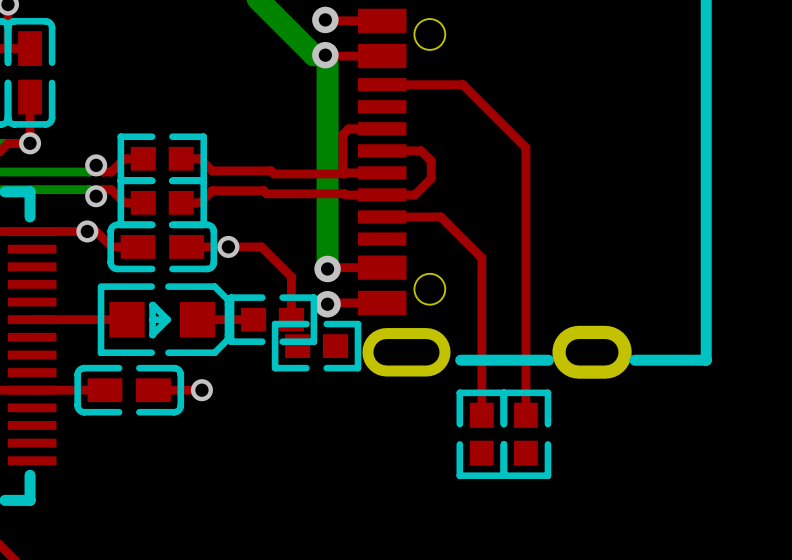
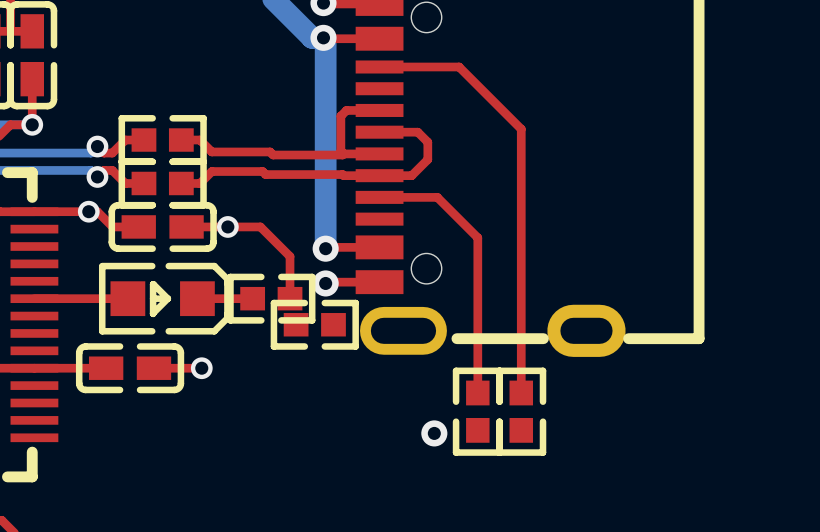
via: none -> (434, 433)

